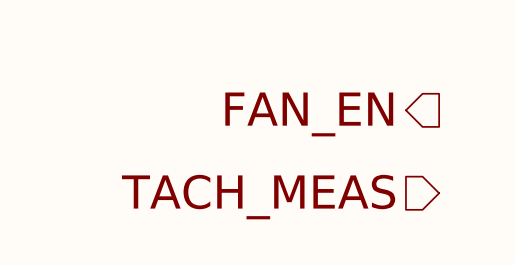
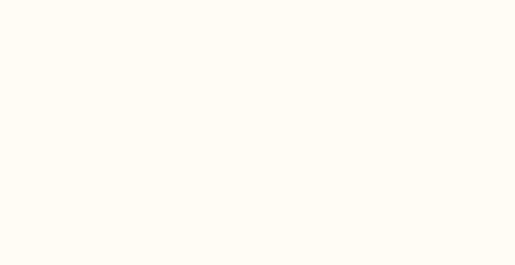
hierarchical label: FAN_EN (309, 114) -> none
hierarchical label: TACH_MEAS (258, 197) -> none

